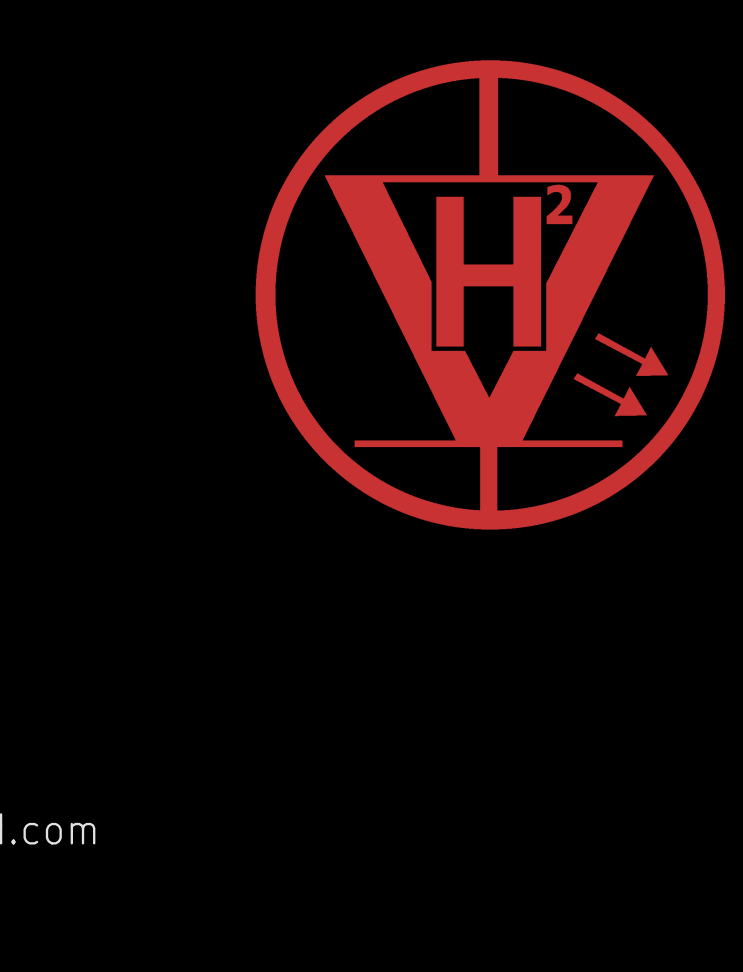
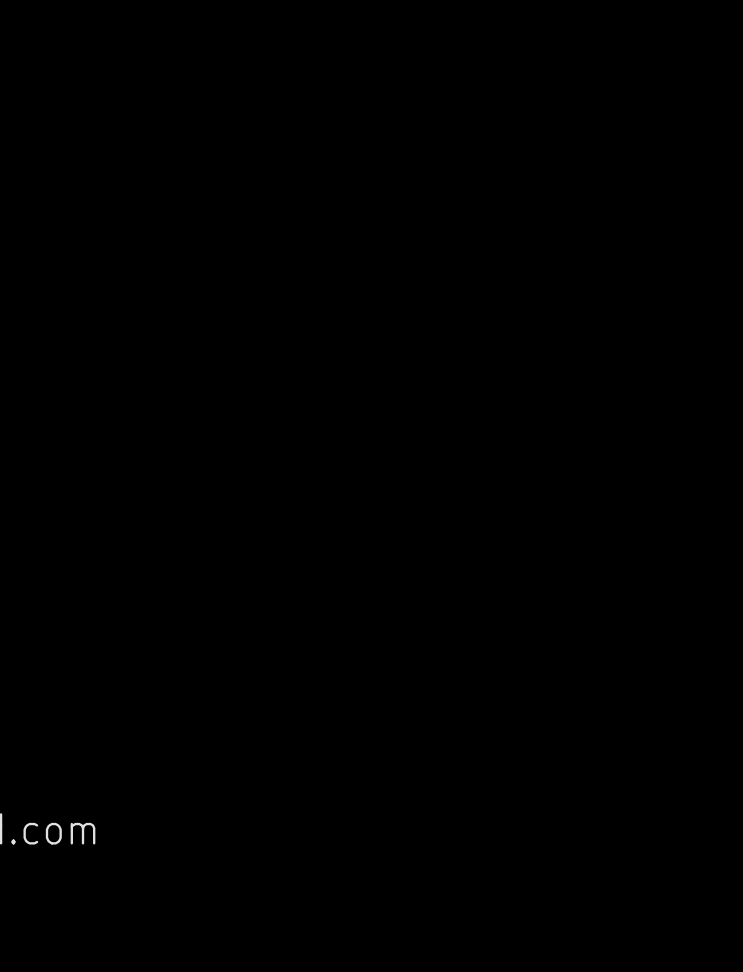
drawing: [255, 60, 725, 530] -> none

